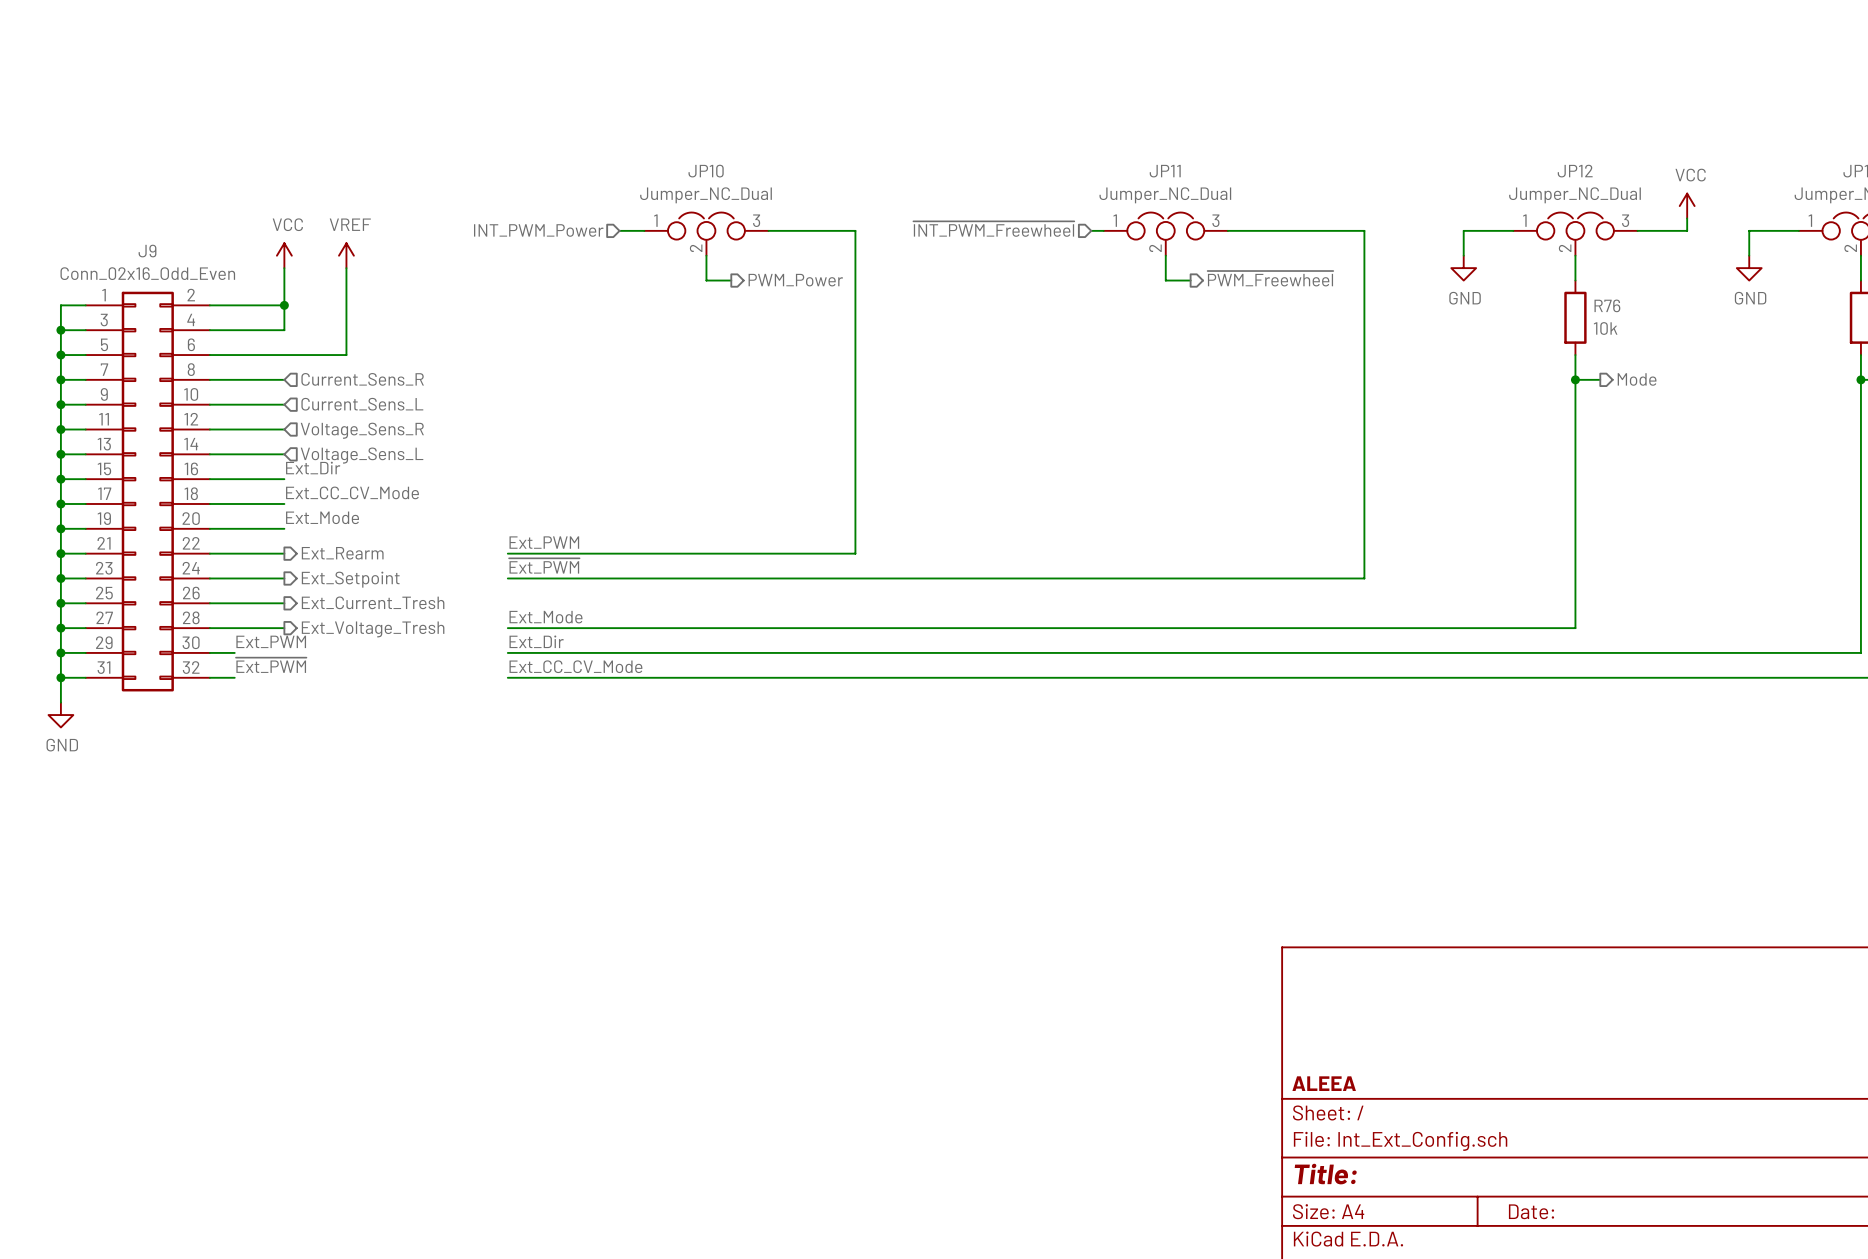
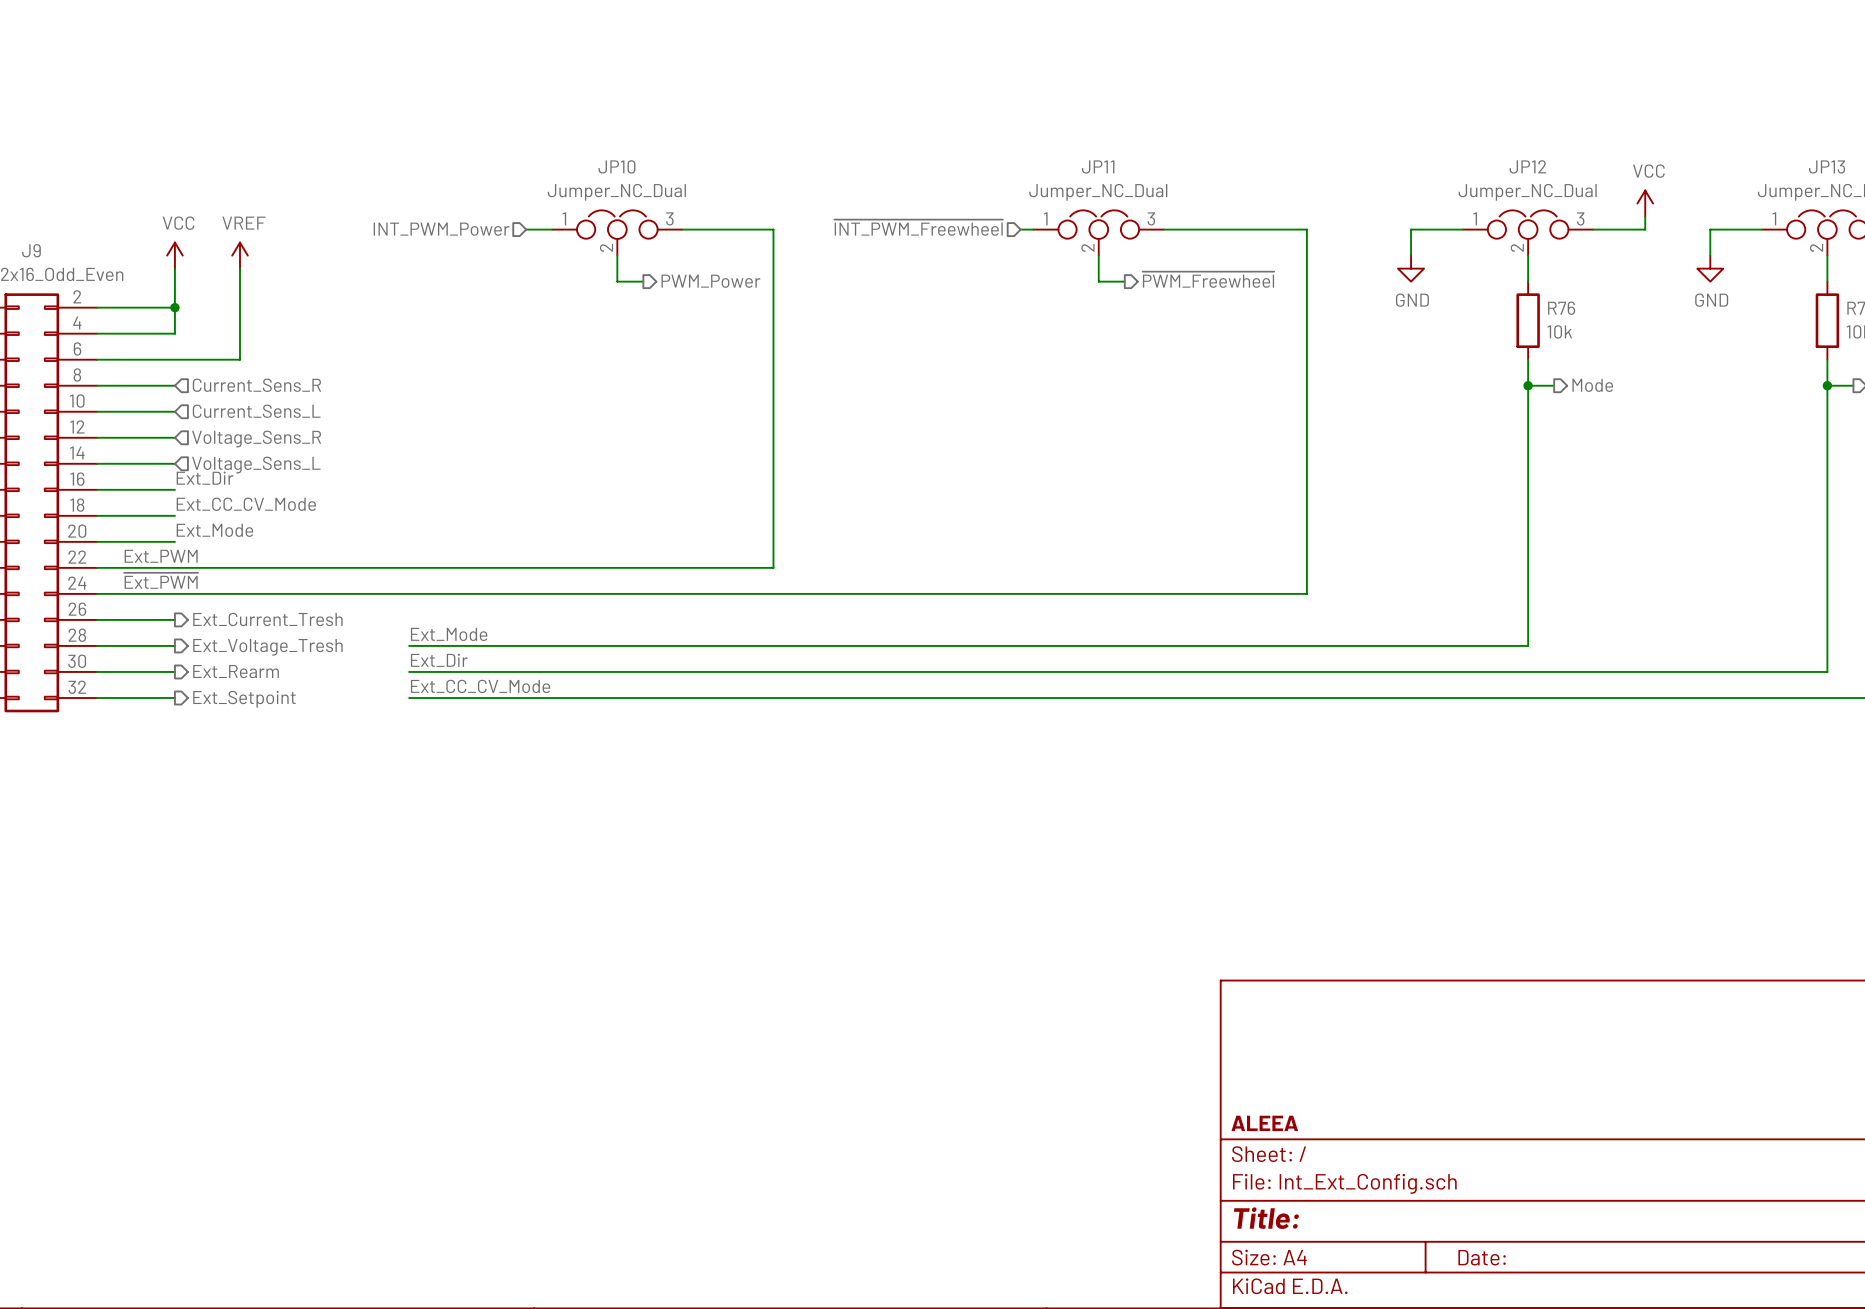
label: Ext_PWM (544, 542) -> none
wire: none -> (174, 567) (409, 567)
hierarchical label position: Ext_Rearm (342, 553) -> Ext_Rearm (236, 671)
label: ~{Ext_PWM} (544, 565) -> none
wire: none -> (174, 593) (409, 593)
hierarchical label position: Ext_Setpoint (350, 579) -> Ext_Setpoint (244, 699)
label position: Ext_PWM (271, 641) -> Ext_PWM (161, 556)
wire: none -> (122, 671) (174, 671)
label position: ~{Ext_PWM} (271, 665) -> ~{Ext_PWM} (161, 580)
wire: none -> (122, 698) (174, 698)

